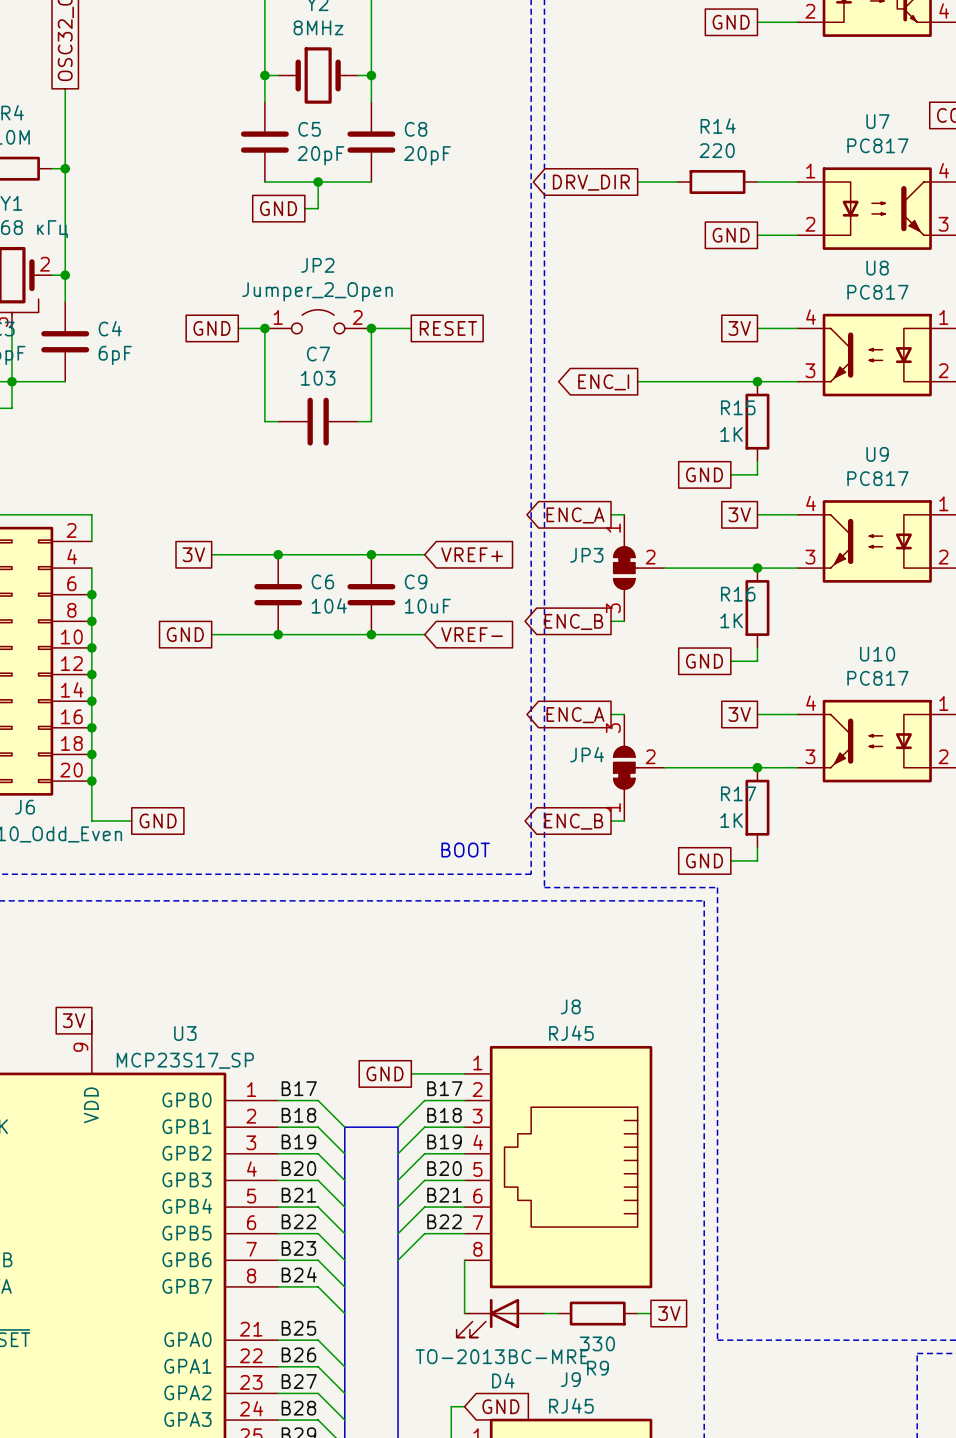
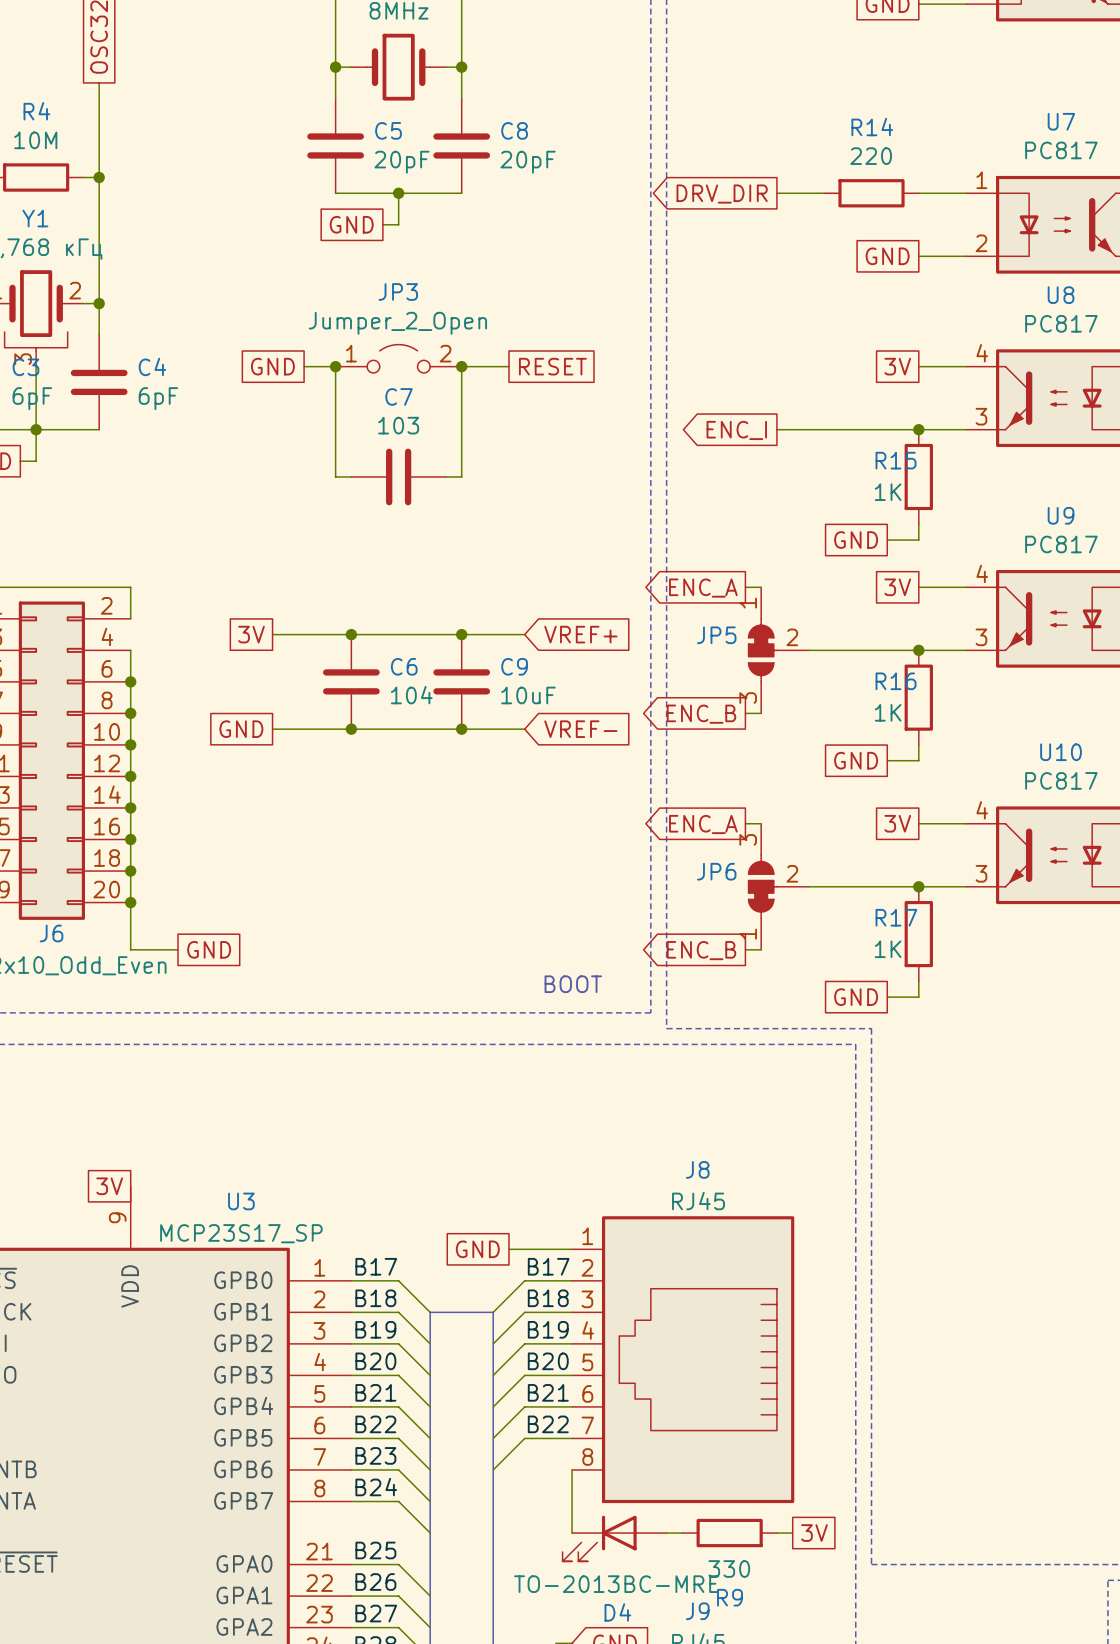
JP2 name: JP2 (317, 265) -> JP3 (398, 291)
JP3 name: JP3 (586, 555) -> JP5 (716, 635)
JP4 name: JP4 (587, 754) -> JP6 (716, 871)

